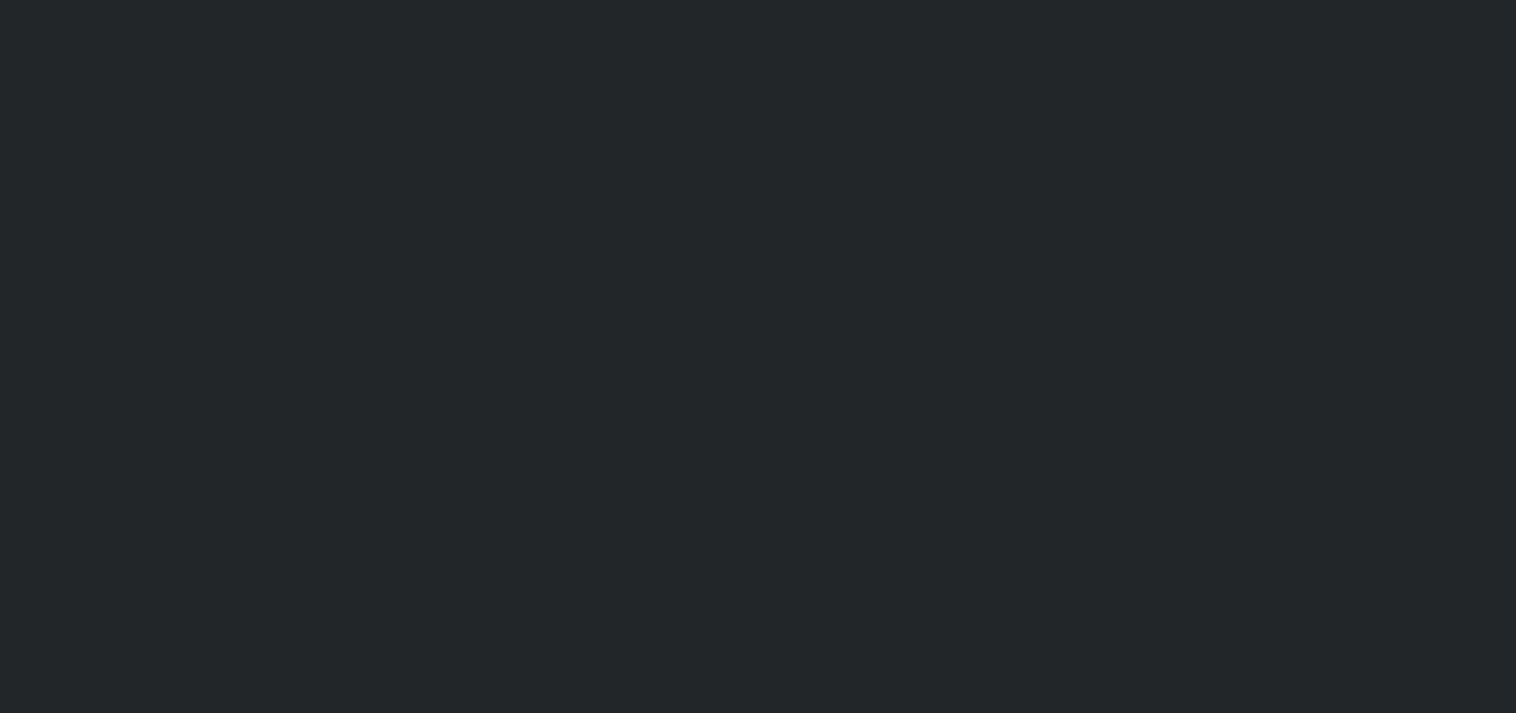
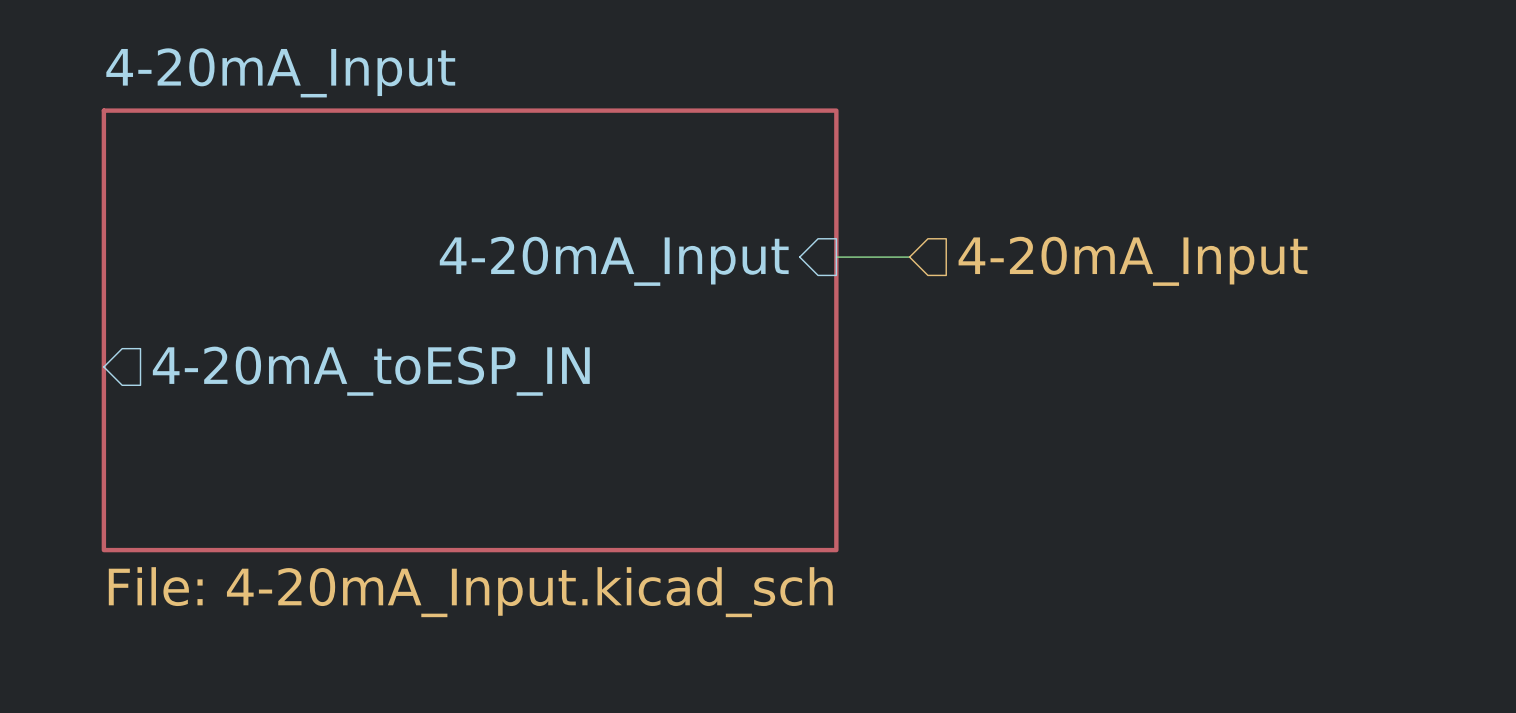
wire: none -> (836, 257) (909, 257)
sheet pin: none -> 4-20mA_Input (614, 261)
hierarchical label: none -> 4-20mA_Input (1133, 261)
sheet 4-20mA_Input: none -> File: 4-20mA_Input.kicad_sch (470, 330)
sheet pin: none -> 4-20mA_toESP_IN (371, 371)

